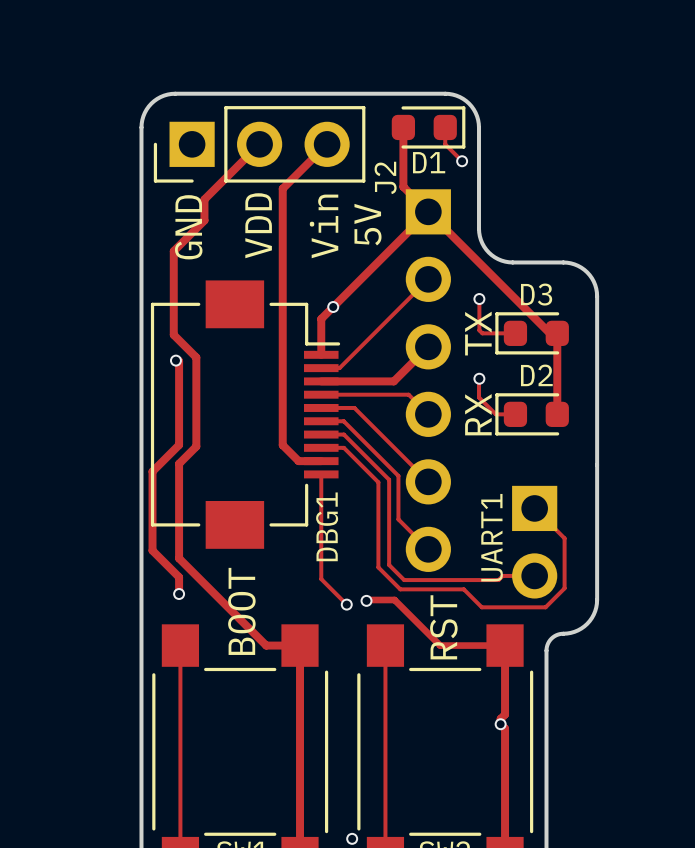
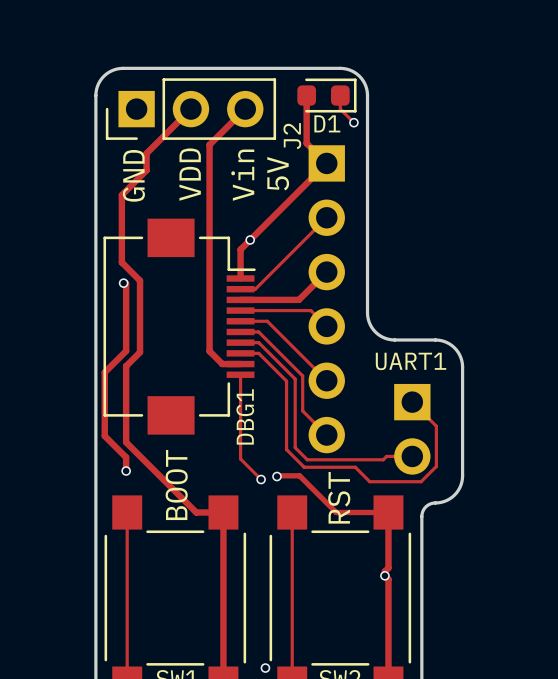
track: (428, 211) (549, 333) (557, 333) (557, 414) -> none
board edge: (478, 228) (484, 246) (498, 259) (508, 262) (570, 263) (584, 269) (593, 281) (597, 296) (597, 464) -> (367, 177) (367, 312) (370, 324) (377, 334) (388, 339) (438, 340) (447, 342) (458, 352) (462, 367)
track: (479, 299) (479, 330) (482, 333) (515, 333) -> none
via: (479, 299) -> none
D3: TX (532, 333) -> none
track: (479, 378) (478, 397) (495, 414) (515, 414) -> none
via: (479, 378) -> none
D2: RX (532, 414) -> none
UART1 name rotation: 0° (492, 537) -> 90° clockwise (411, 361)

